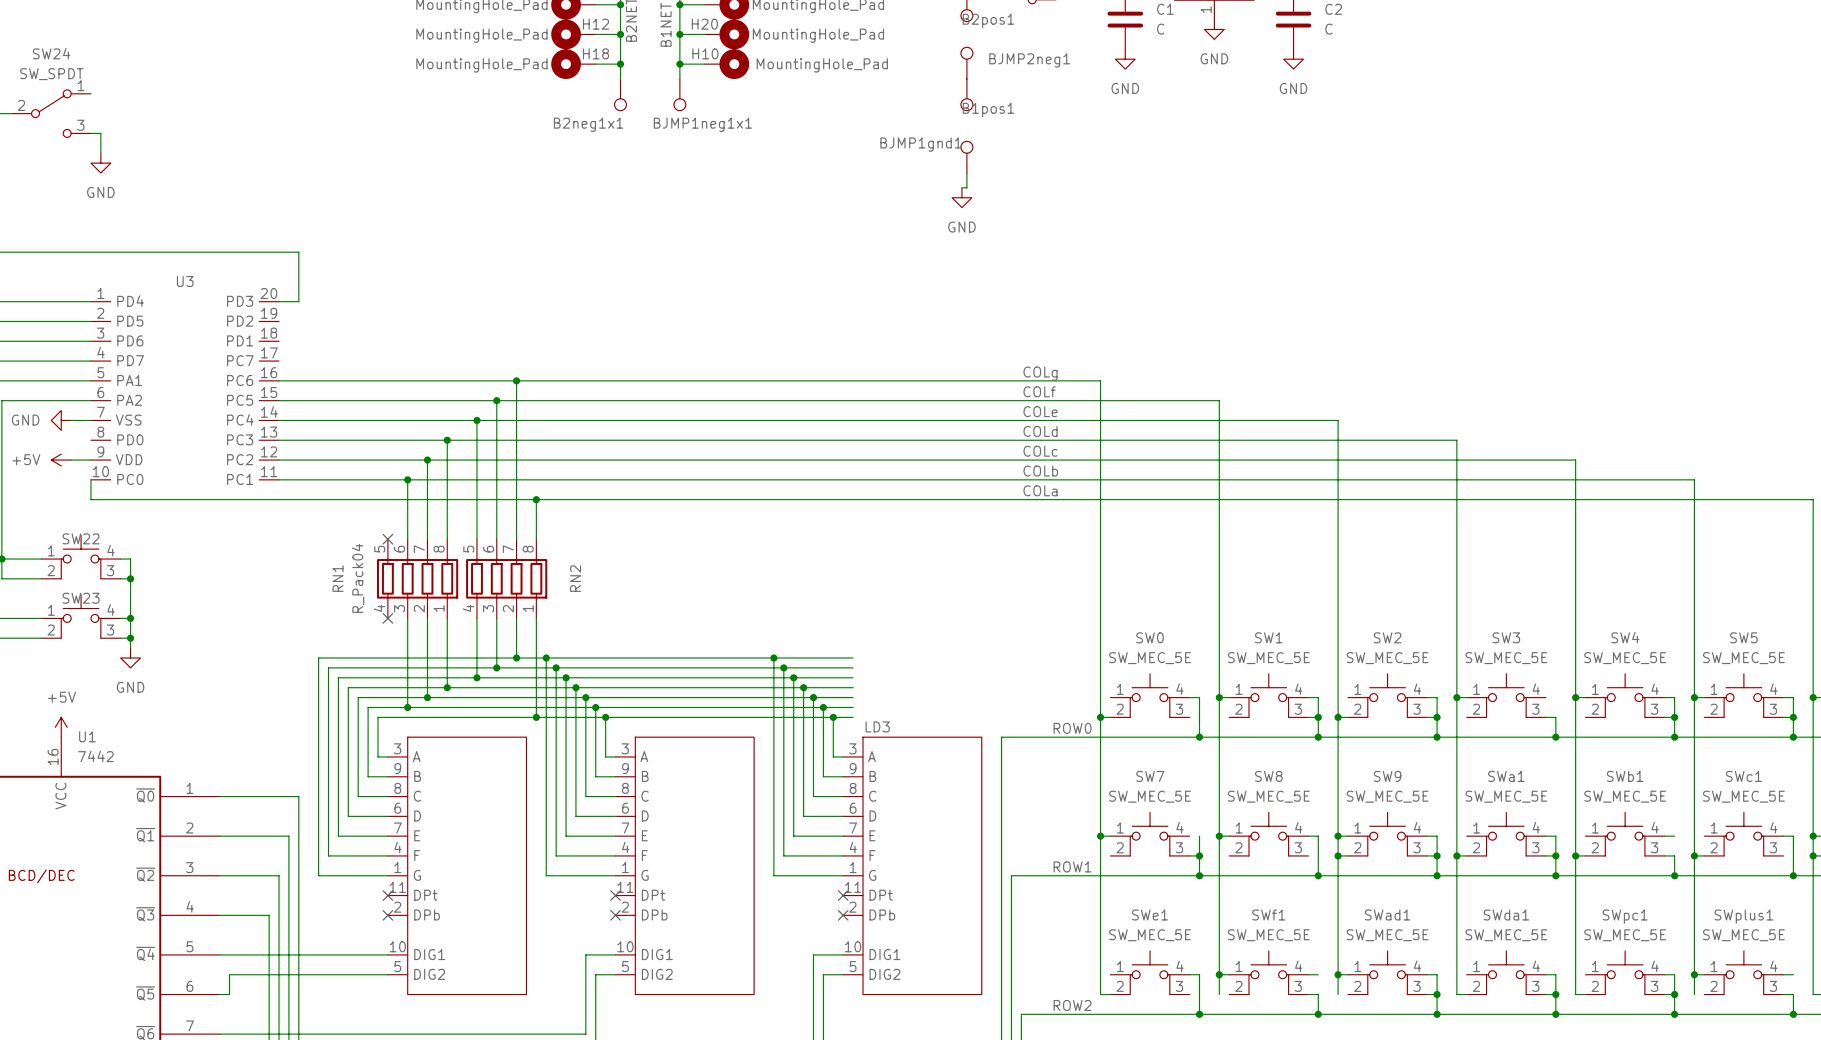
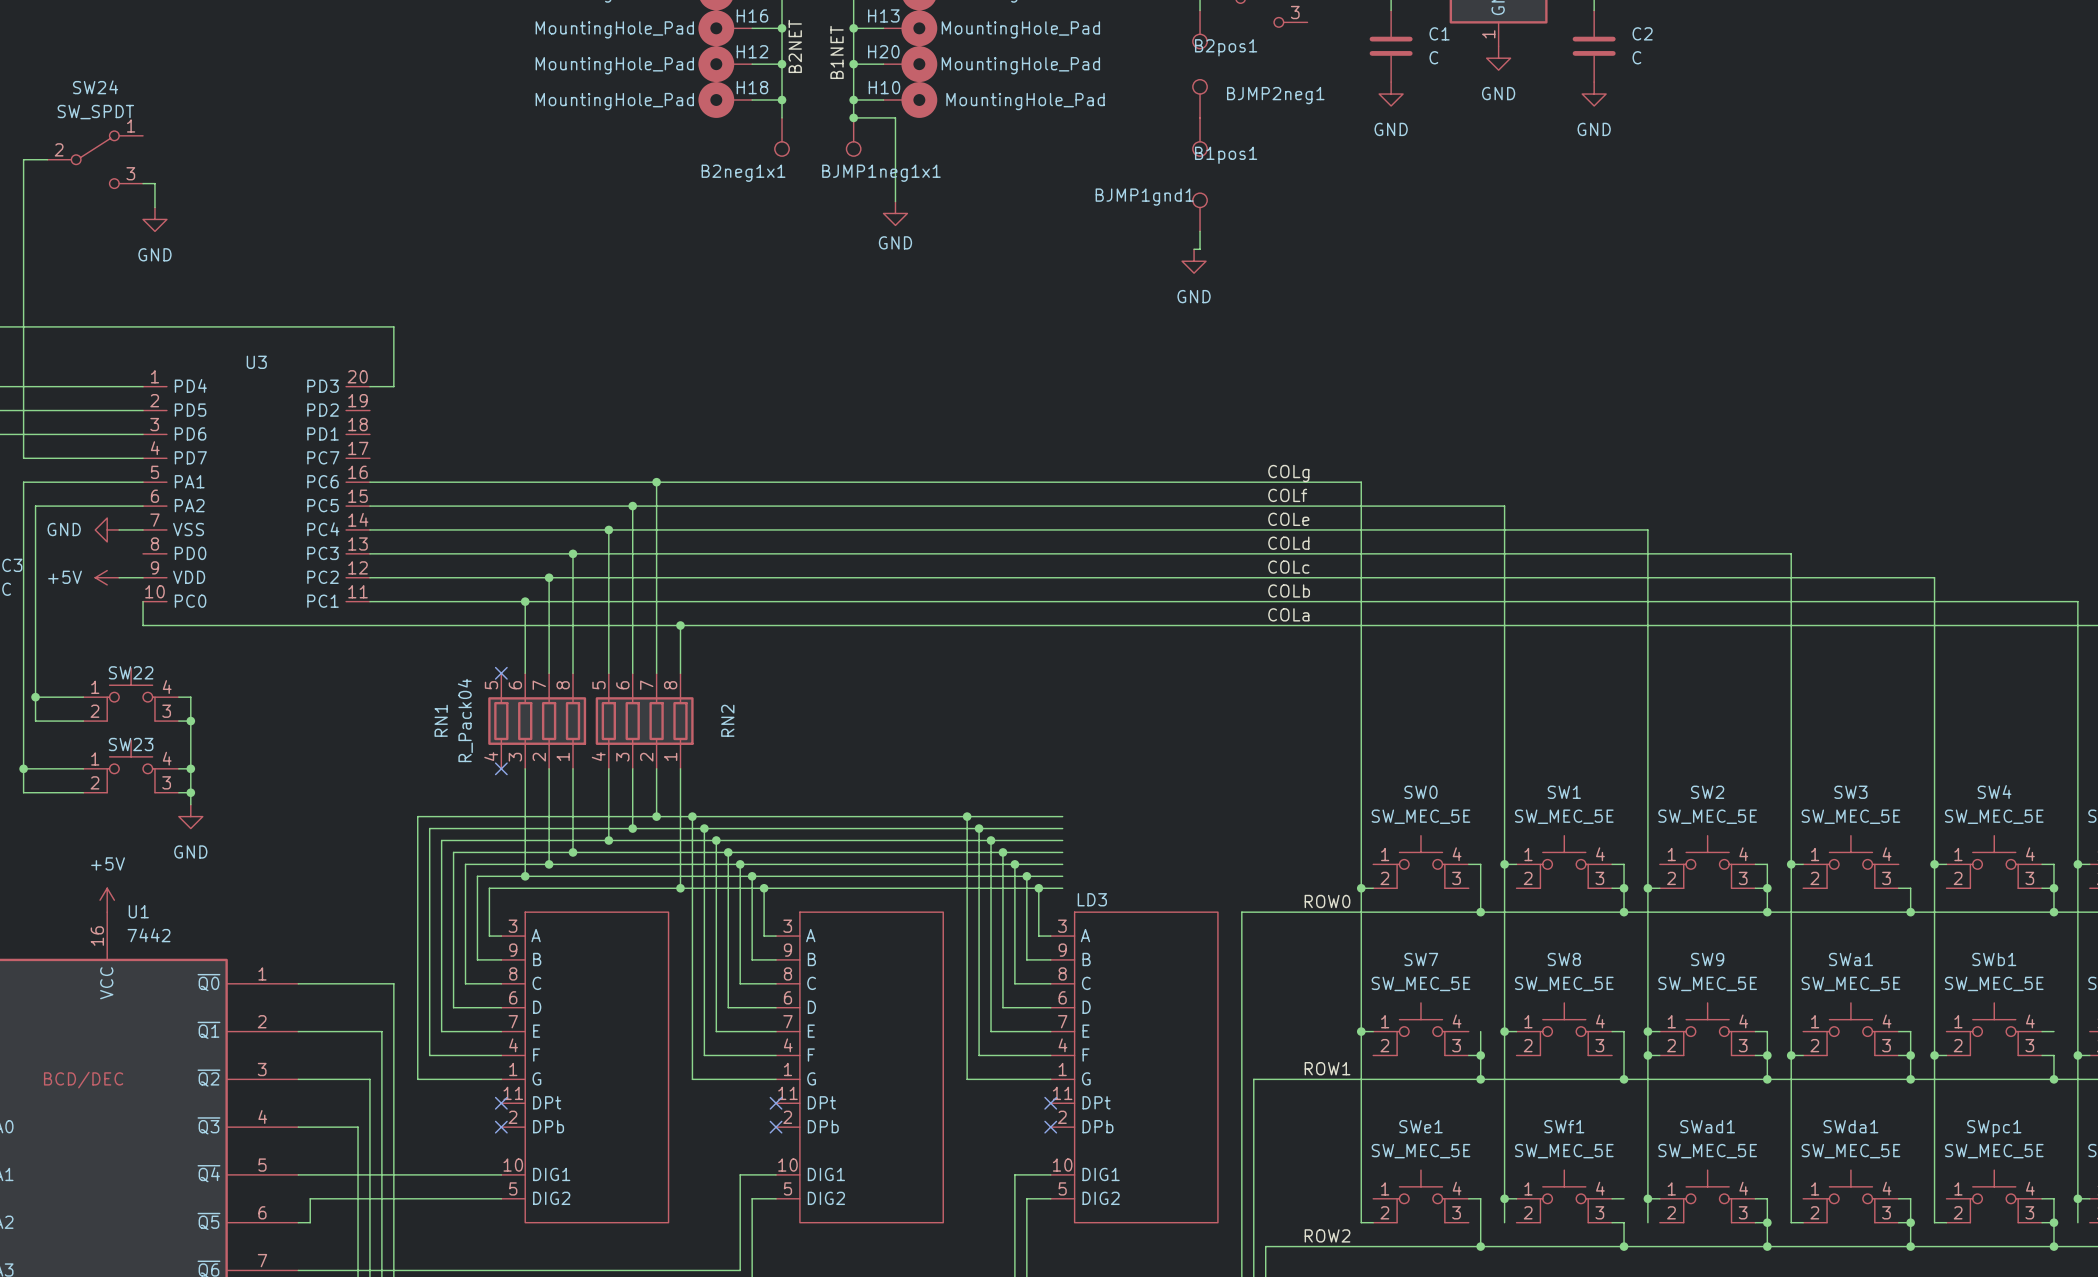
wire: none -> (853, 117) (895, 117) (895, 201)
junction: none -> (853, 117)
power symbol: none -> GND (895, 213)

